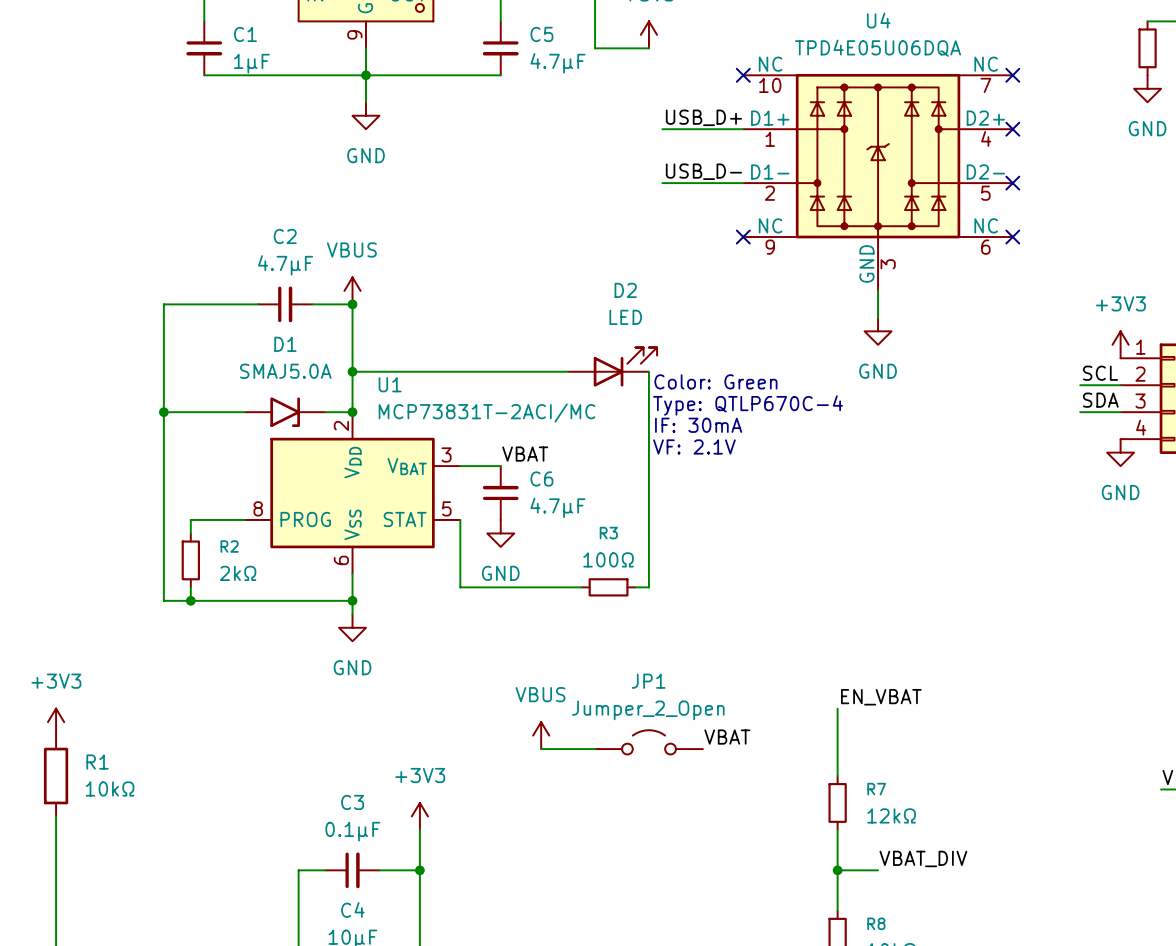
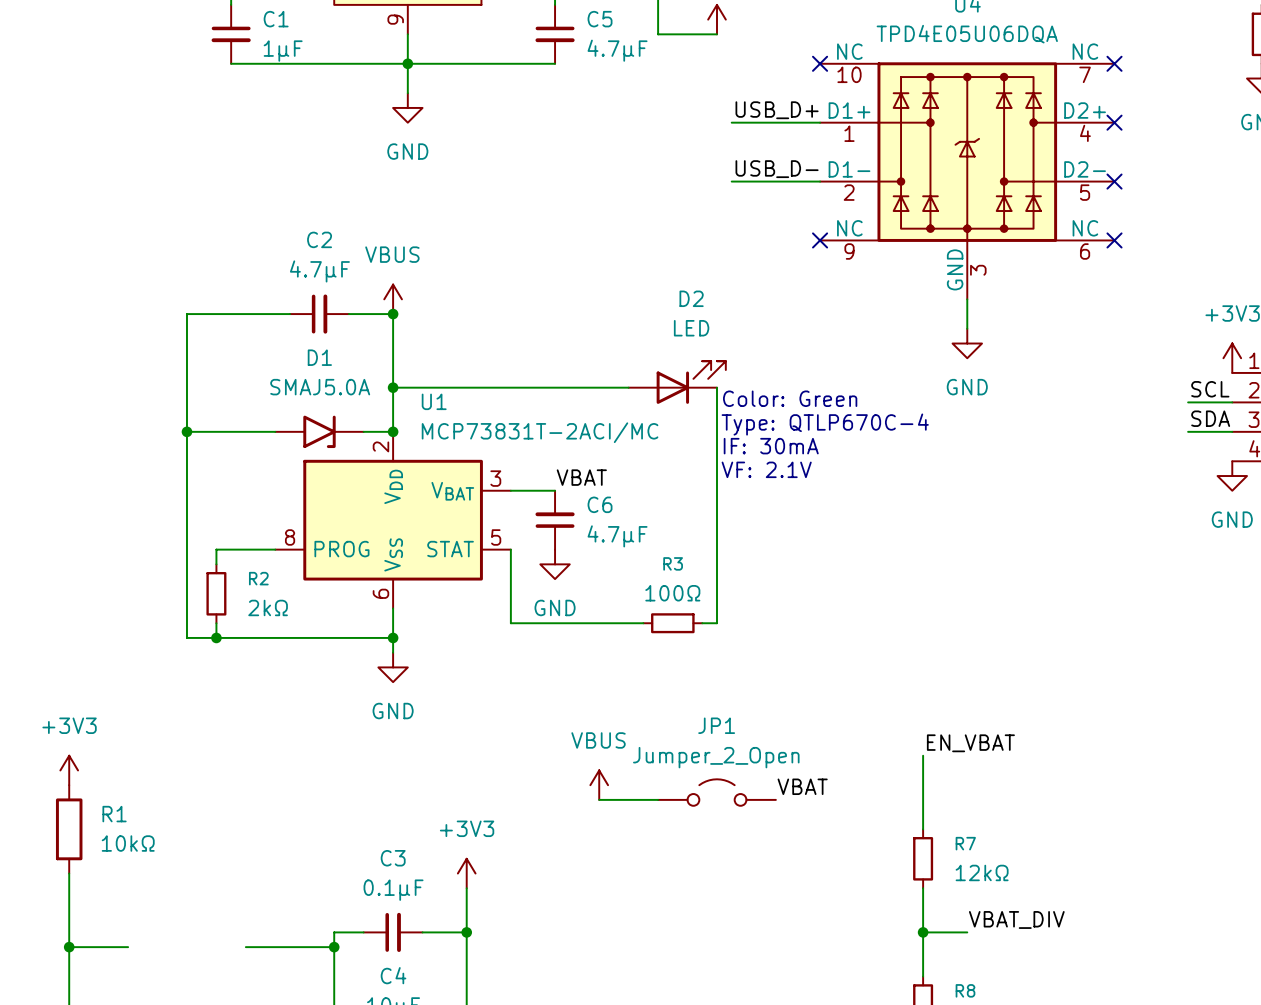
wire: none -> (69, 947) (128, 947)
junction: none -> (69, 947)
wire: none -> (245, 947) (334, 947)
junction: none -> (334, 947)

